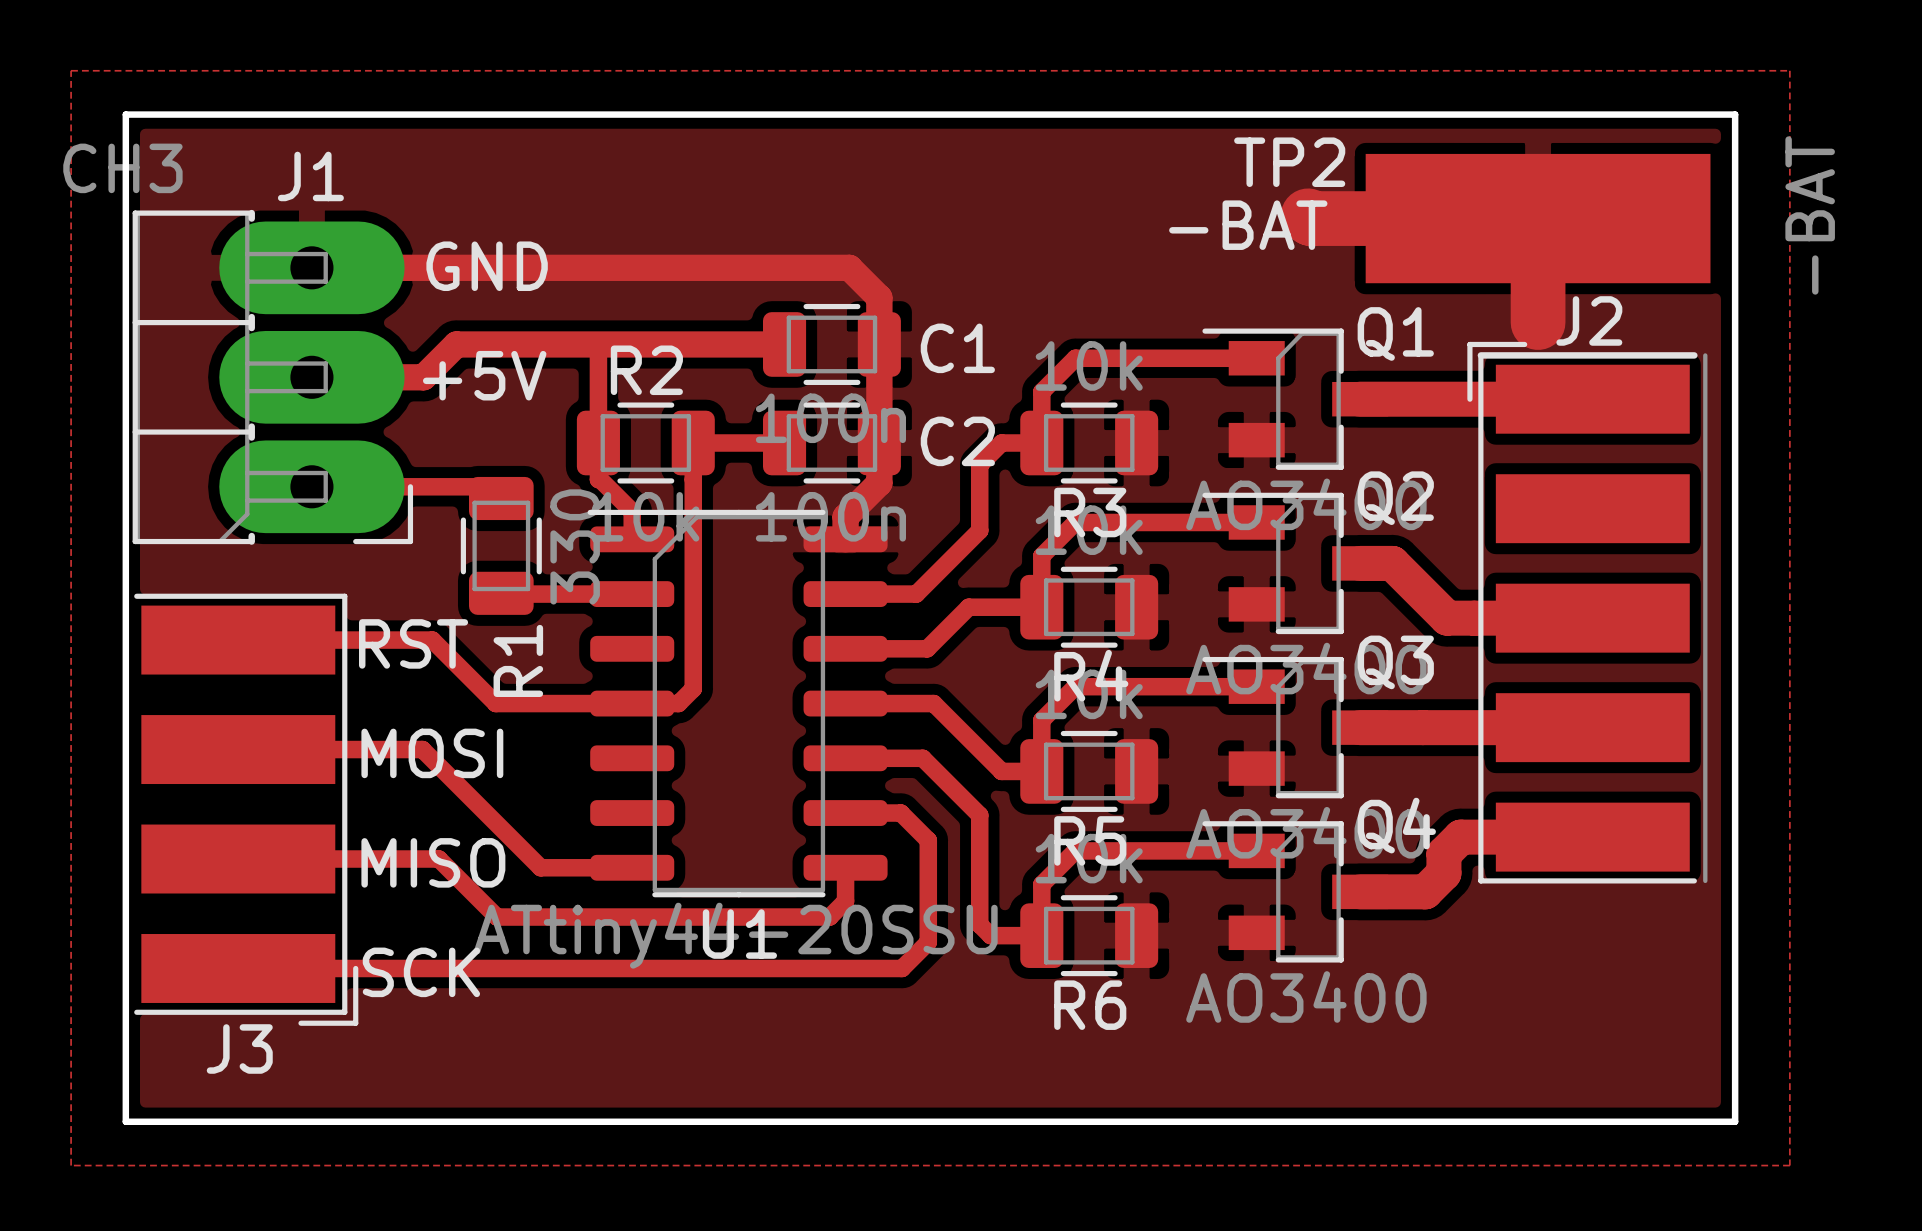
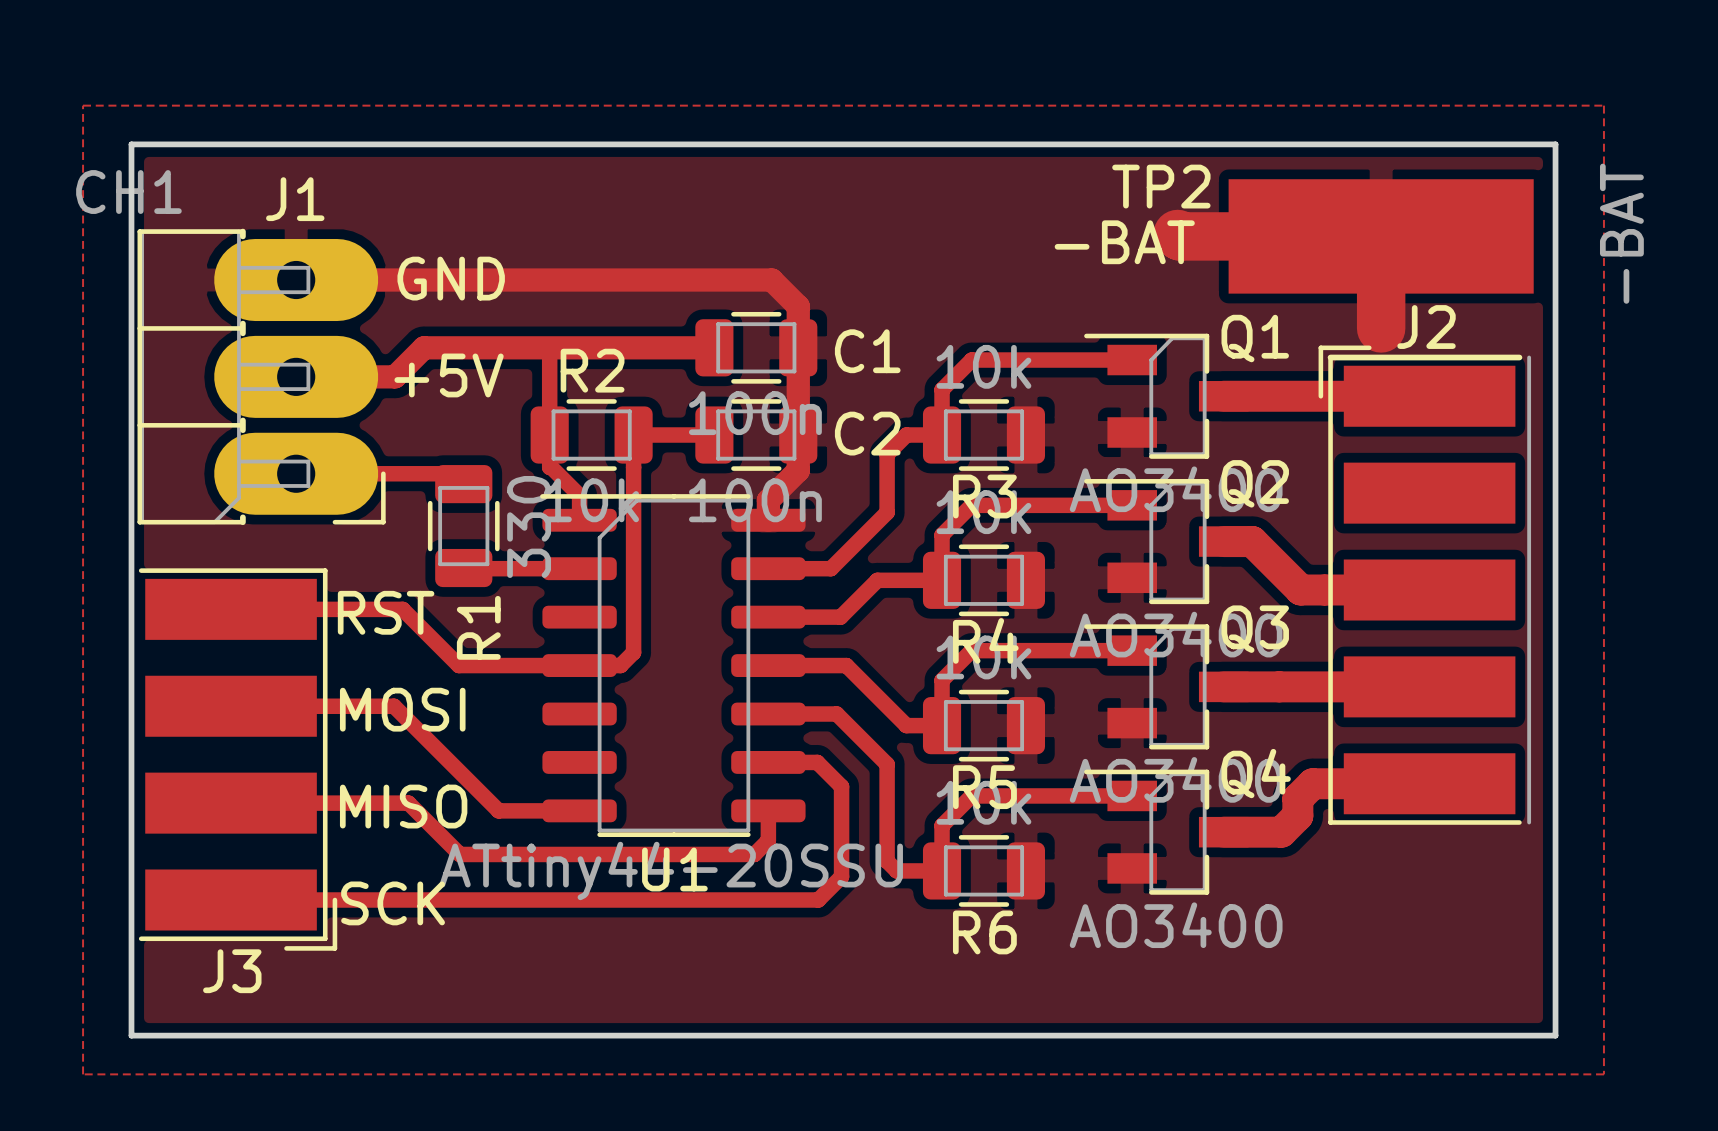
J1 value: CH3 (122, 168) -> CH1 (128, 192)

